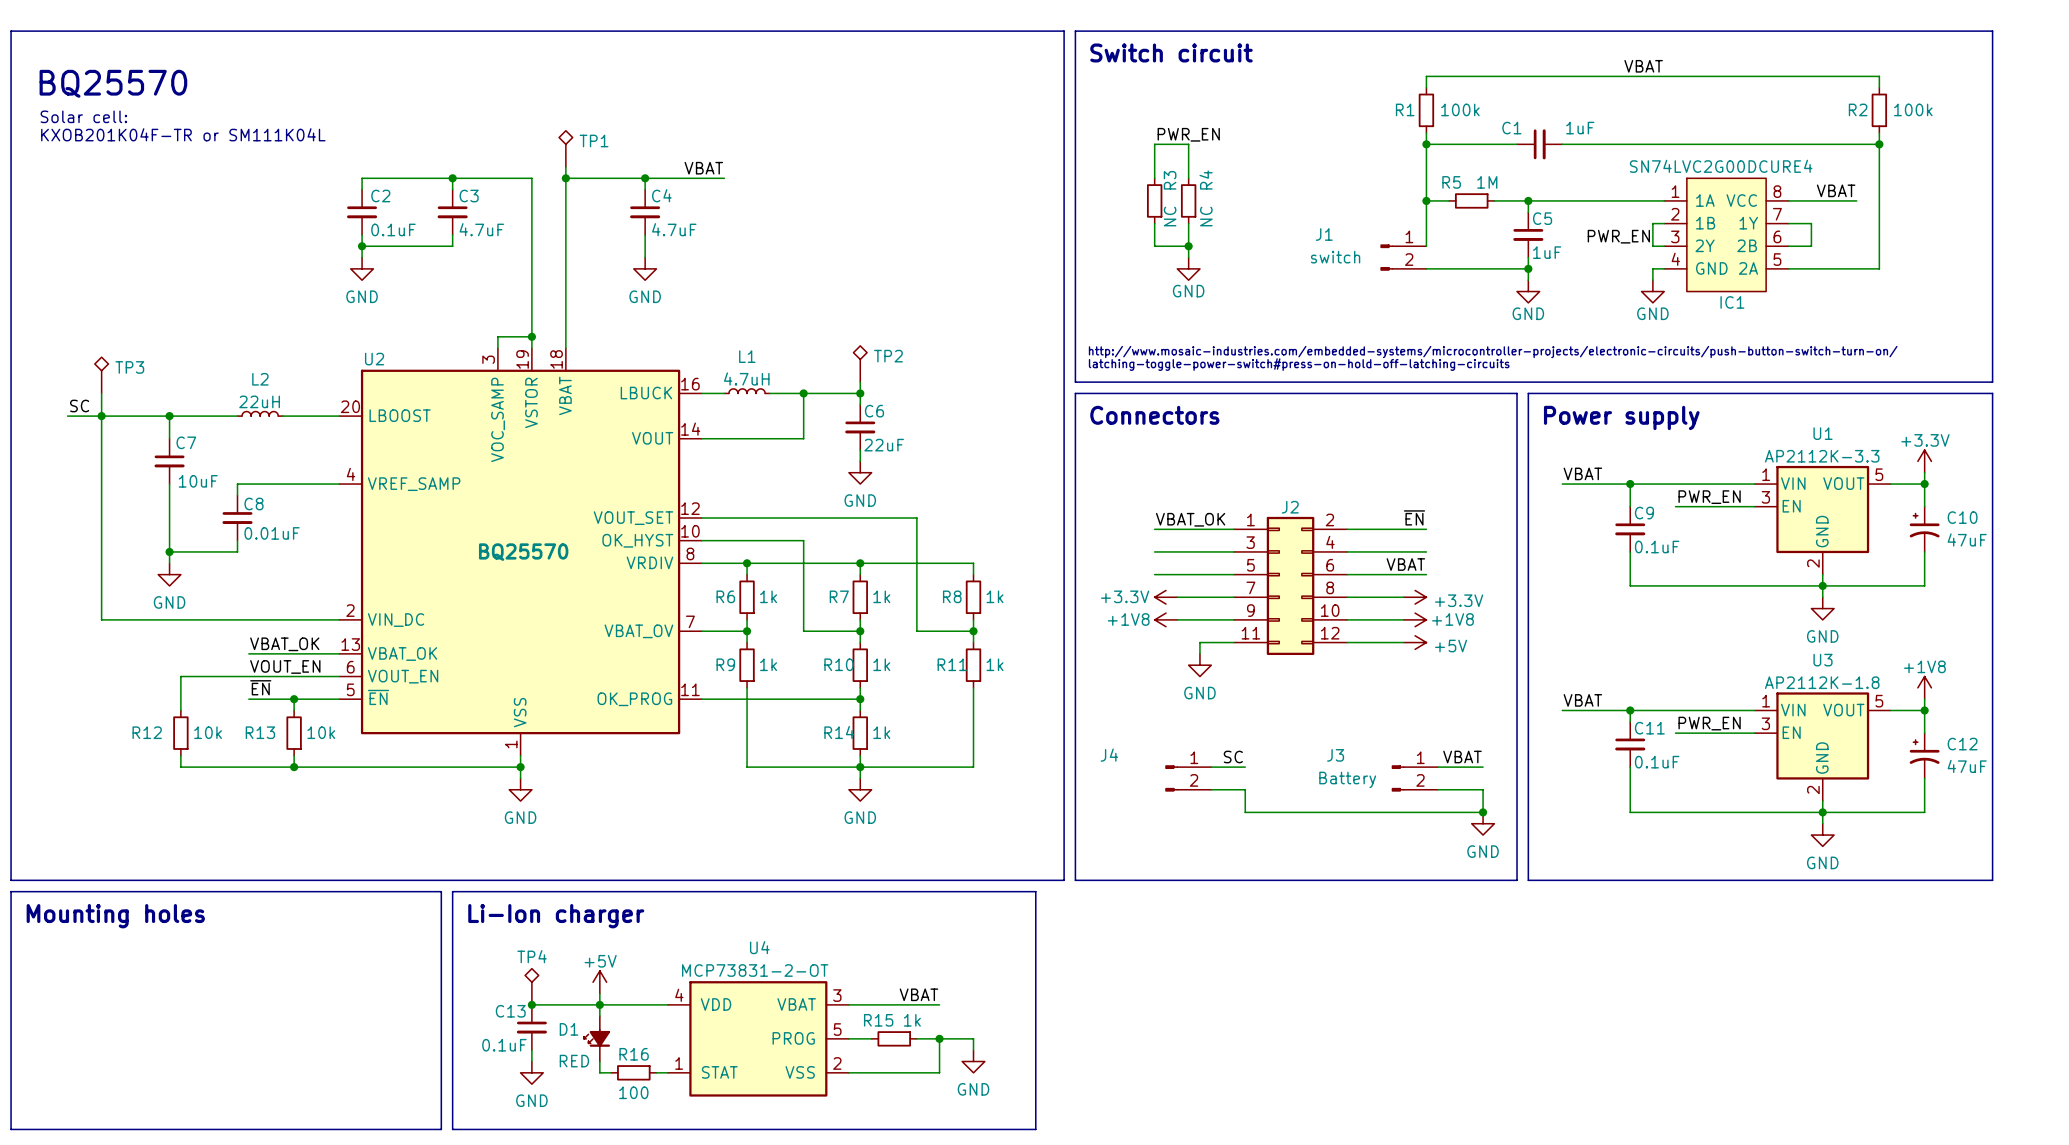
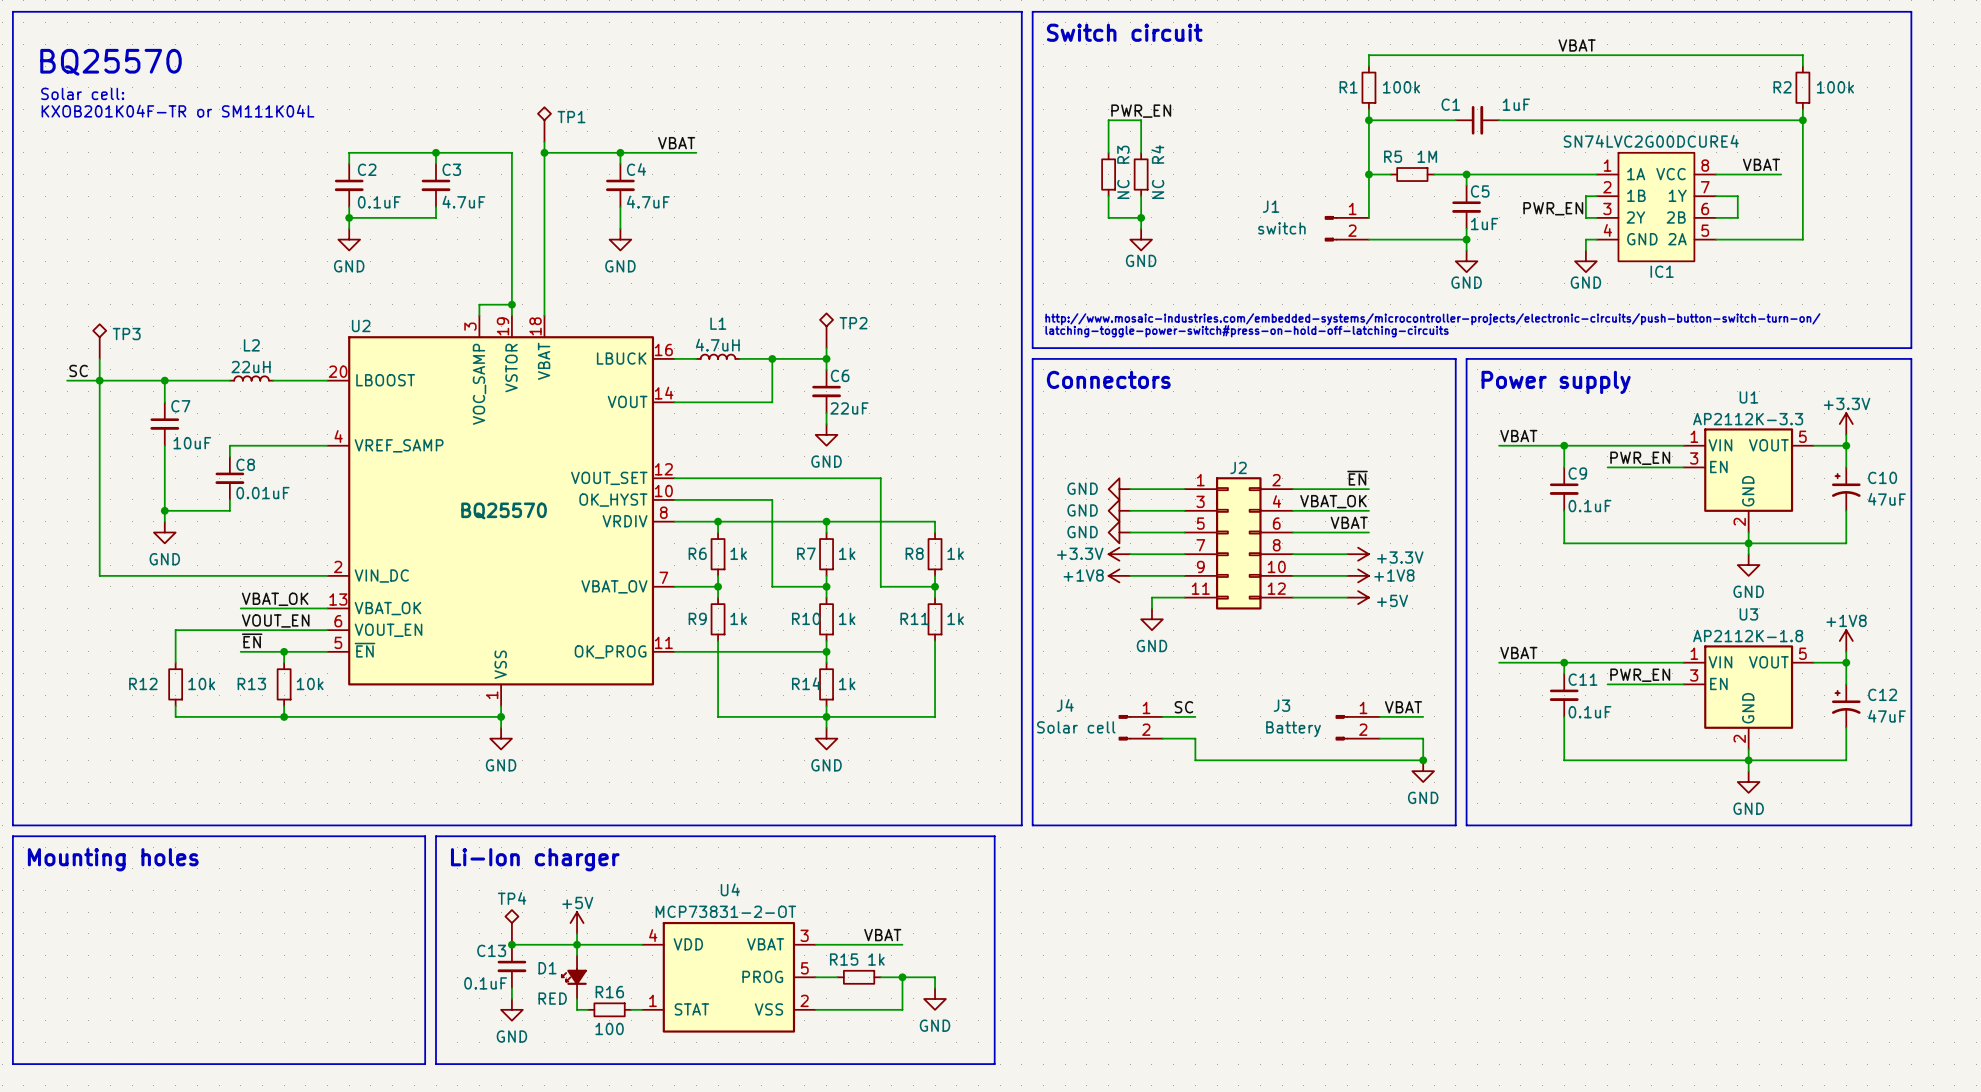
label: VBAT_OK (1190, 519) -> none
power symbol: none -> GND (1119, 489)
label: none -> VBAT_OK (1333, 501)
power symbol: none -> GND (1119, 510)
power symbol: none -> GND (1119, 532)
J4 value: none -> Solar cell (1076, 727)

